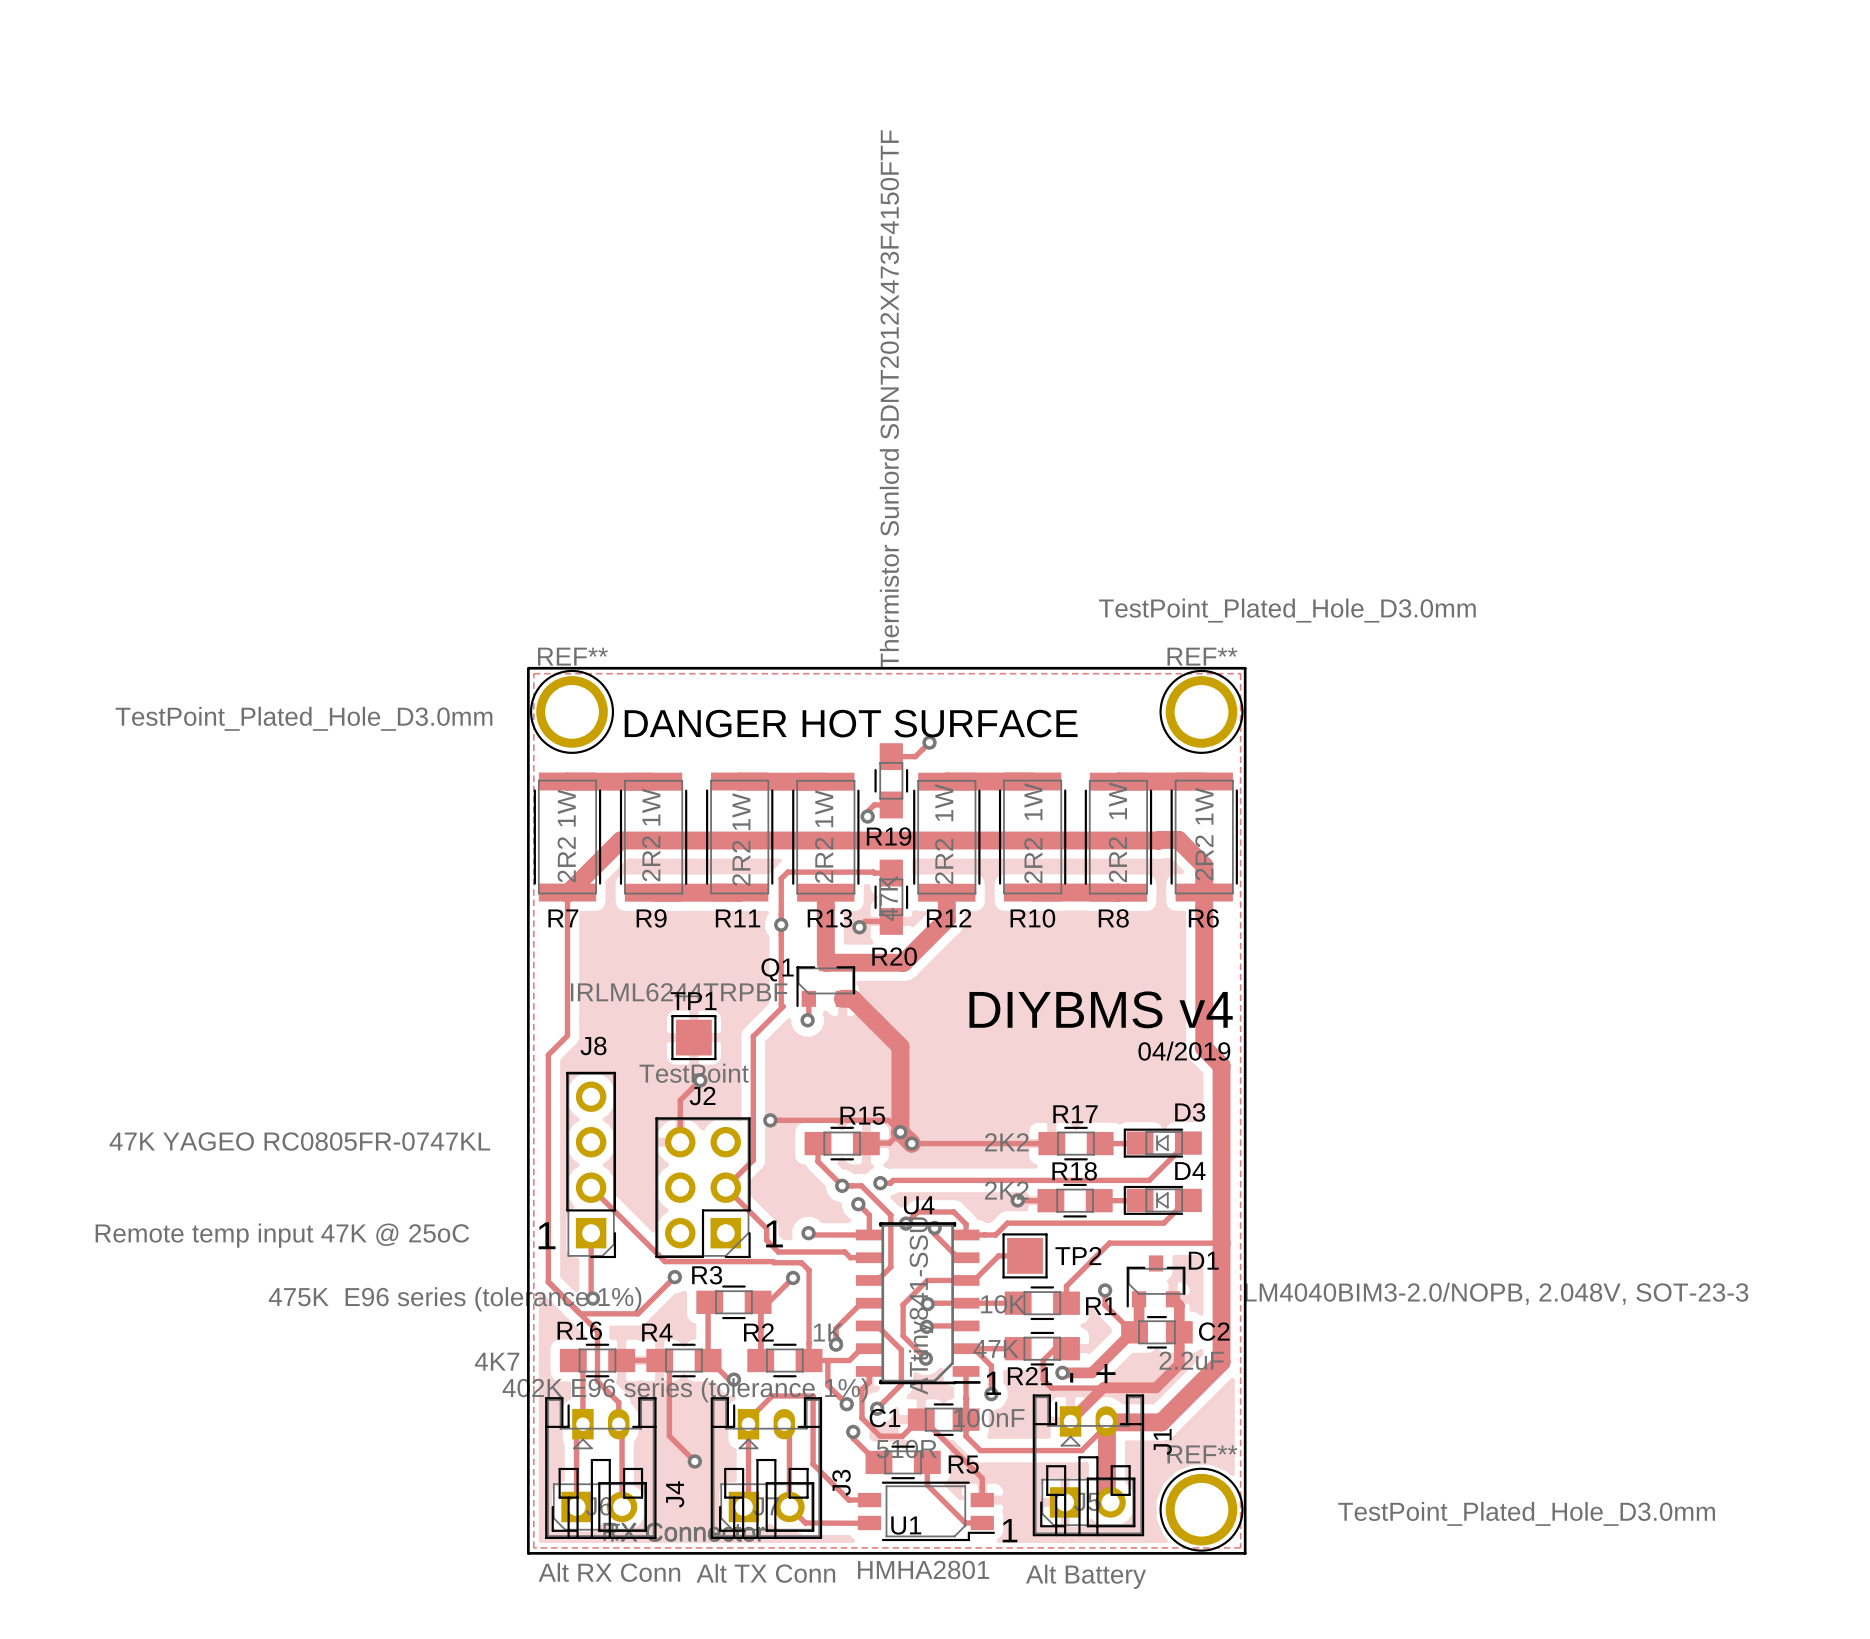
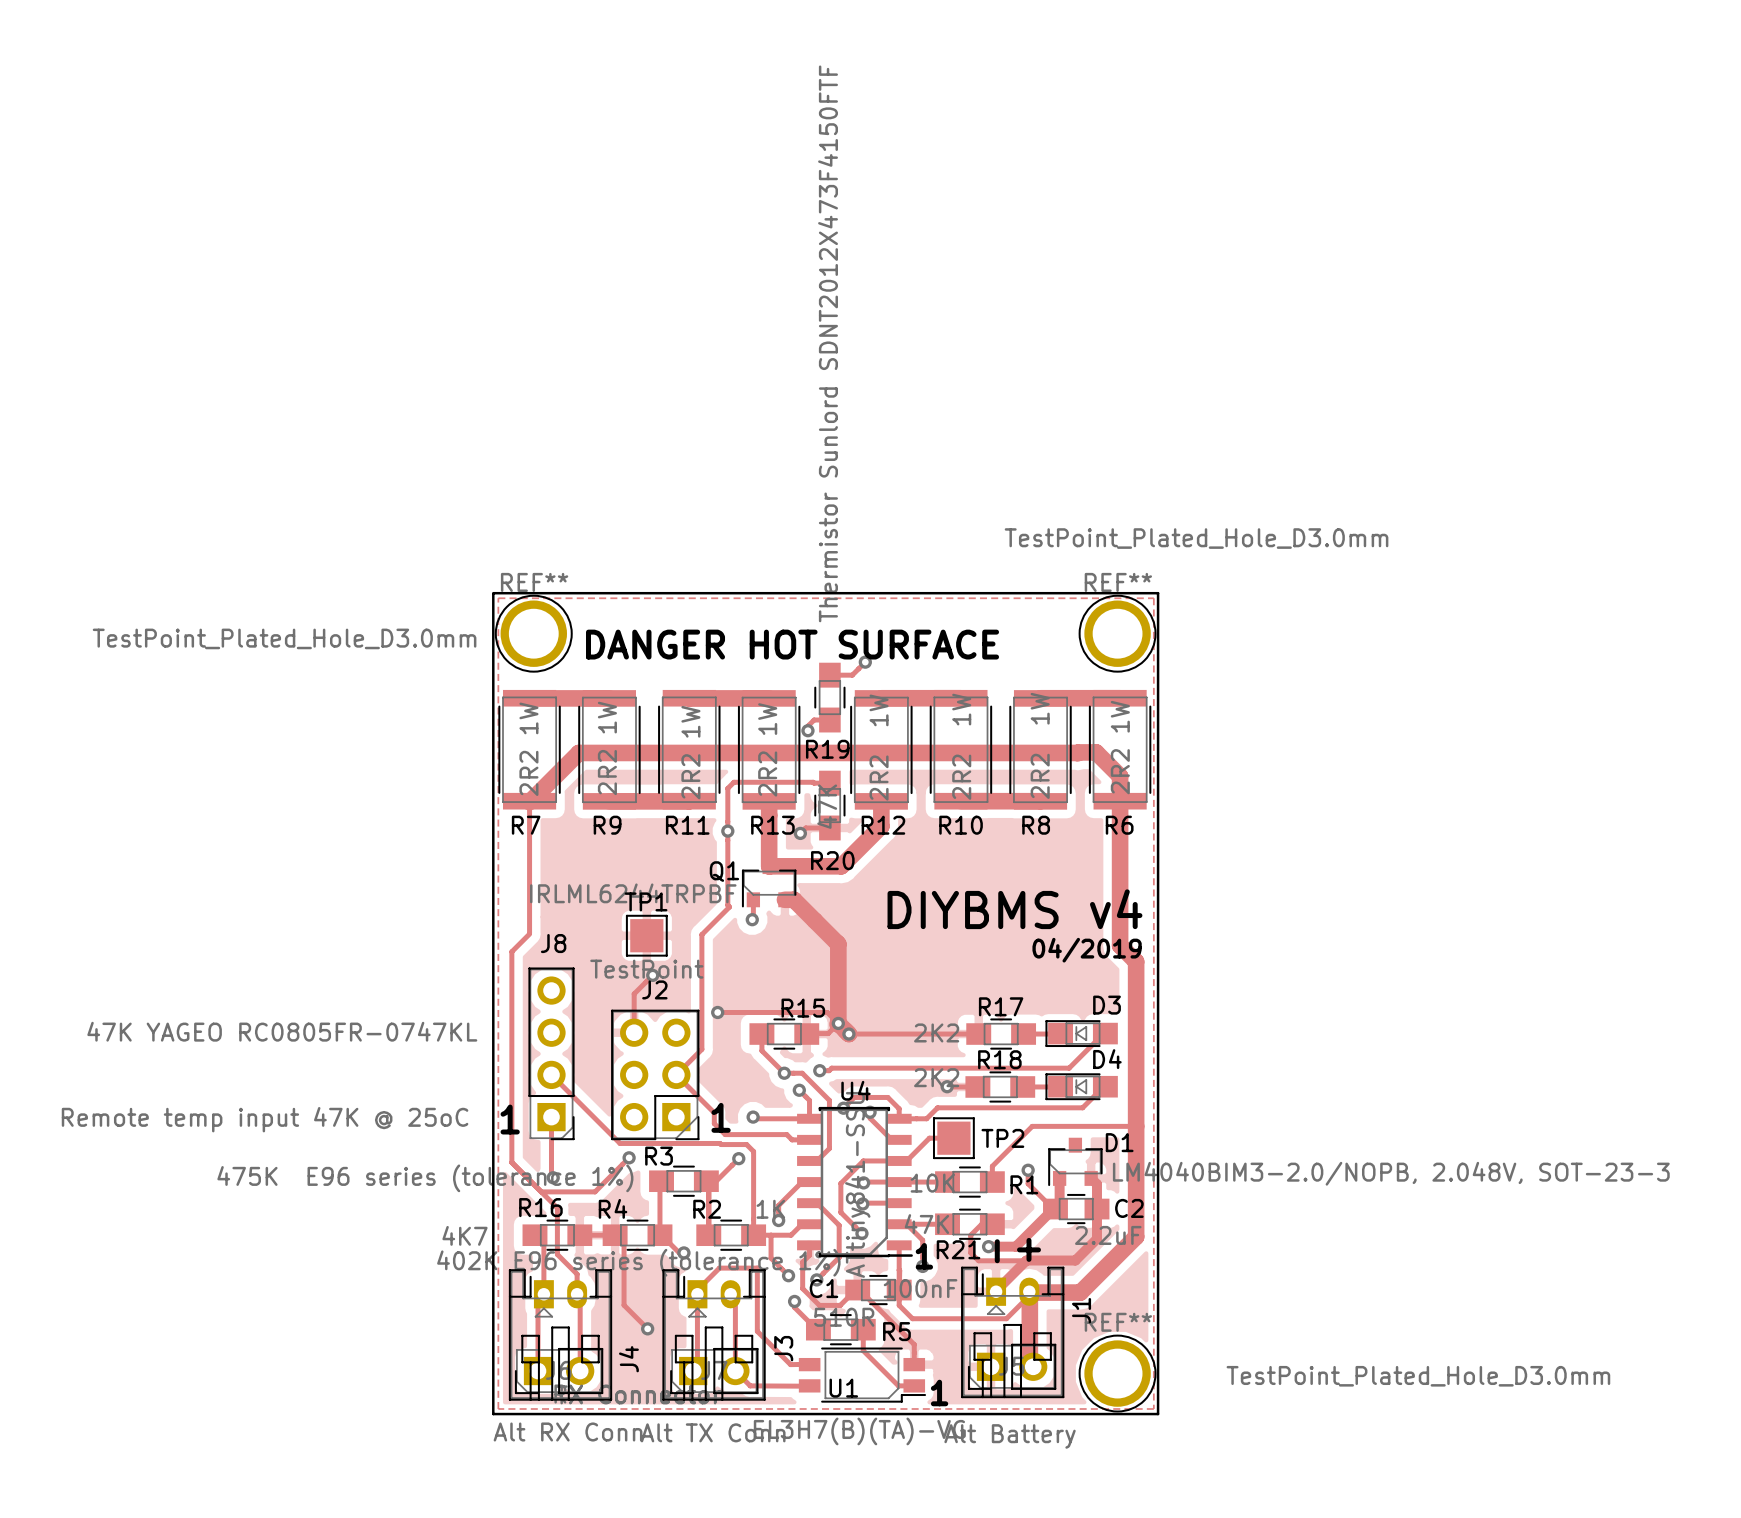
U1 value: HMHA2801 (923, 1569) -> EL3H7(B)(TA)-VG (859, 1431)

